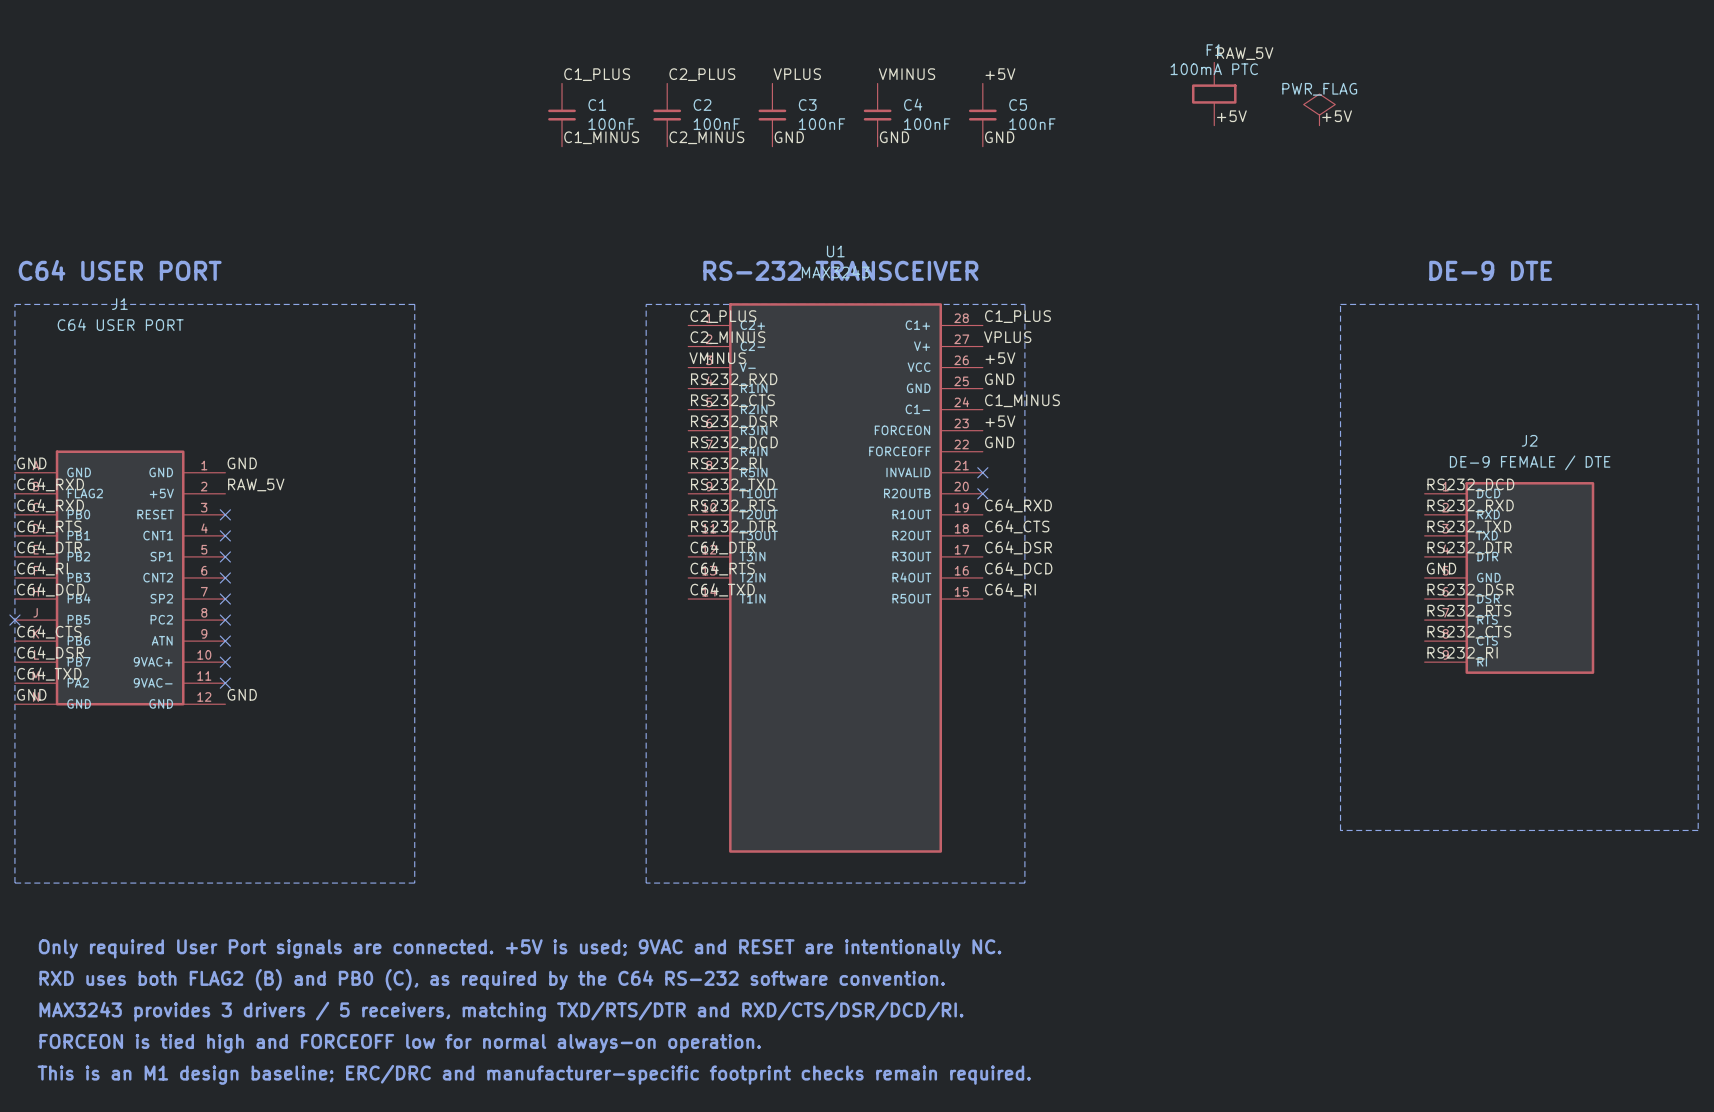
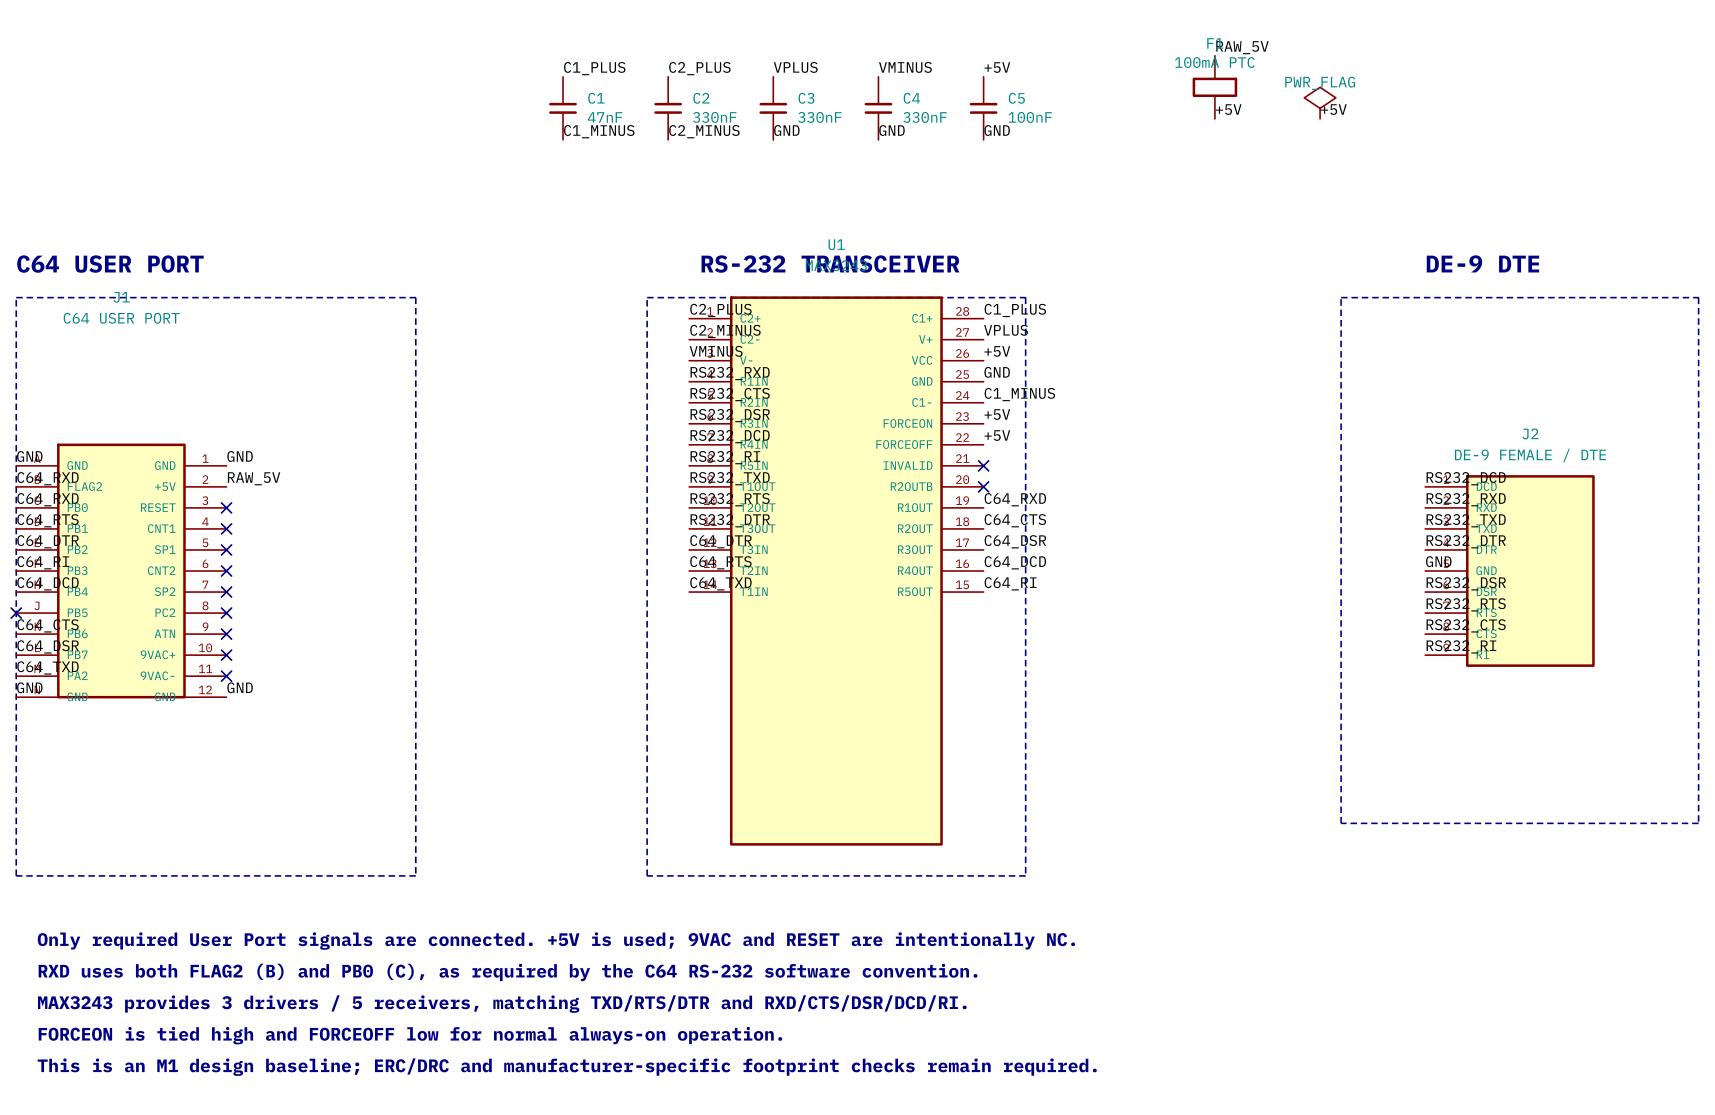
C1 value: 100nF (611, 124) -> 47nF (605, 117)
C2 value: 100nF (716, 124) -> 330nF (714, 117)
C3 value: 100nF (821, 124) -> 330nF (819, 117)
C4 value: 100nF (927, 124) -> 330nF (925, 117)
label: GND (999, 442) -> +5V (997, 435)

